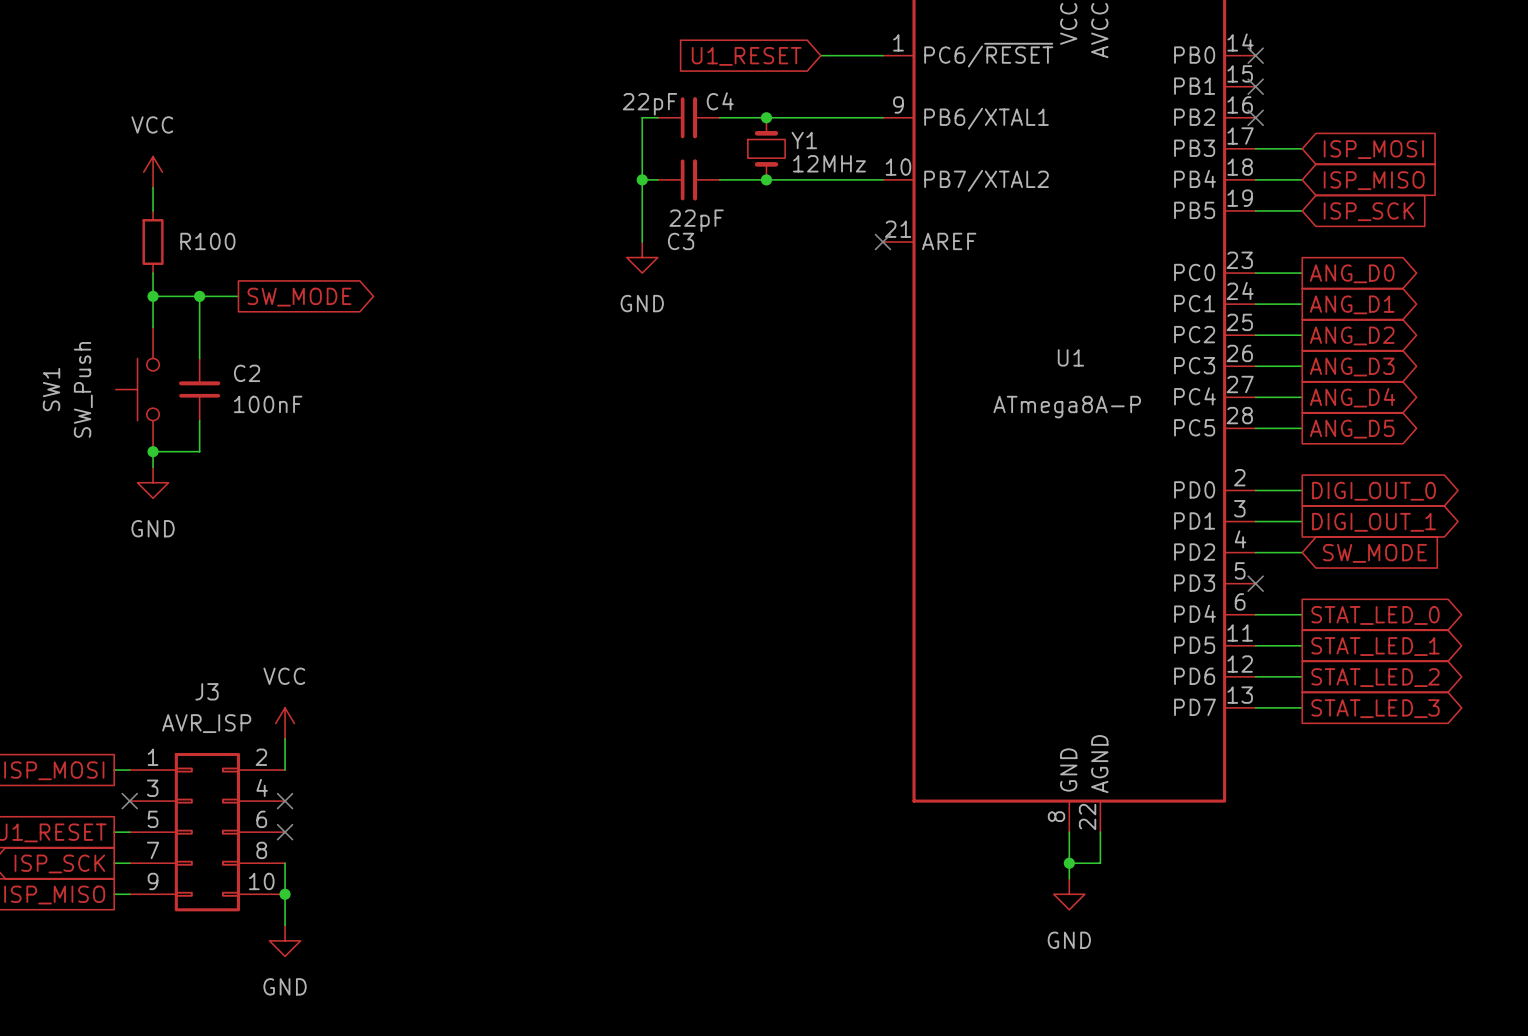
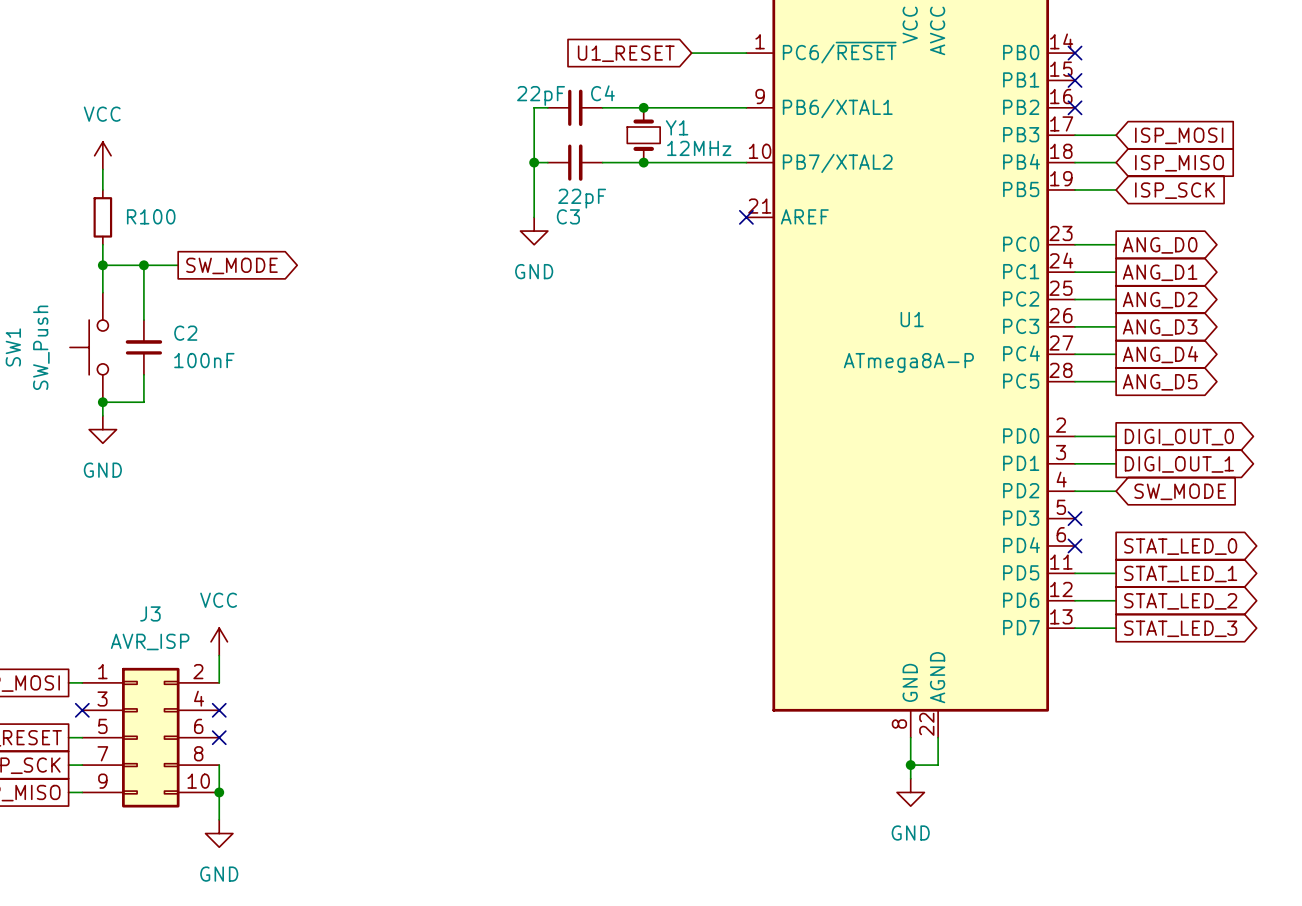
wire: (1255, 614) (1302, 614) -> none
no-connect mark: none -> (1075, 545)

